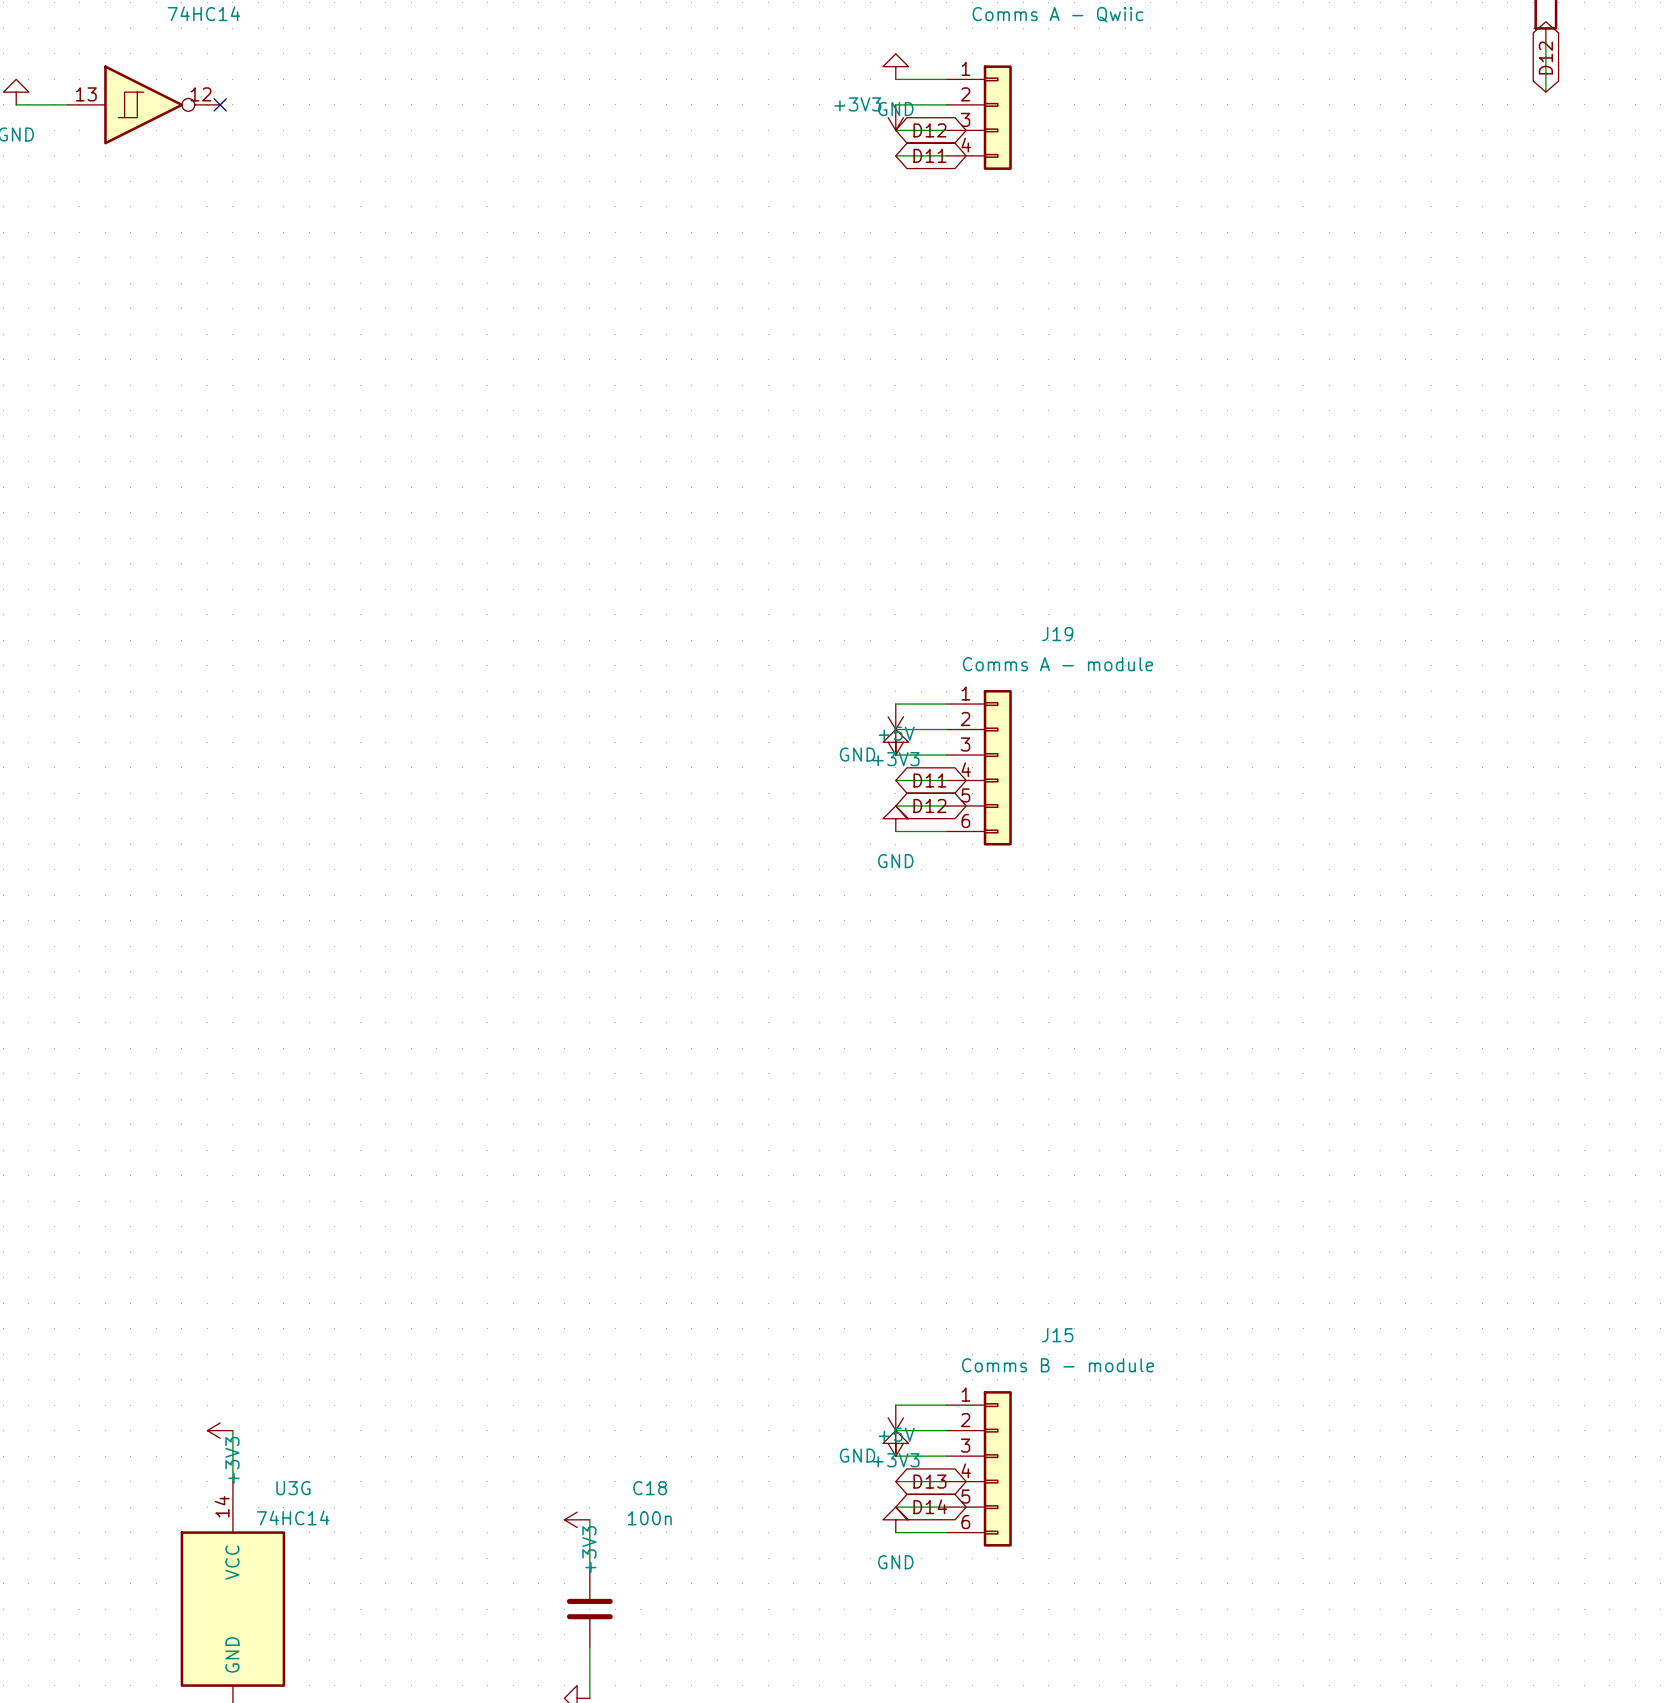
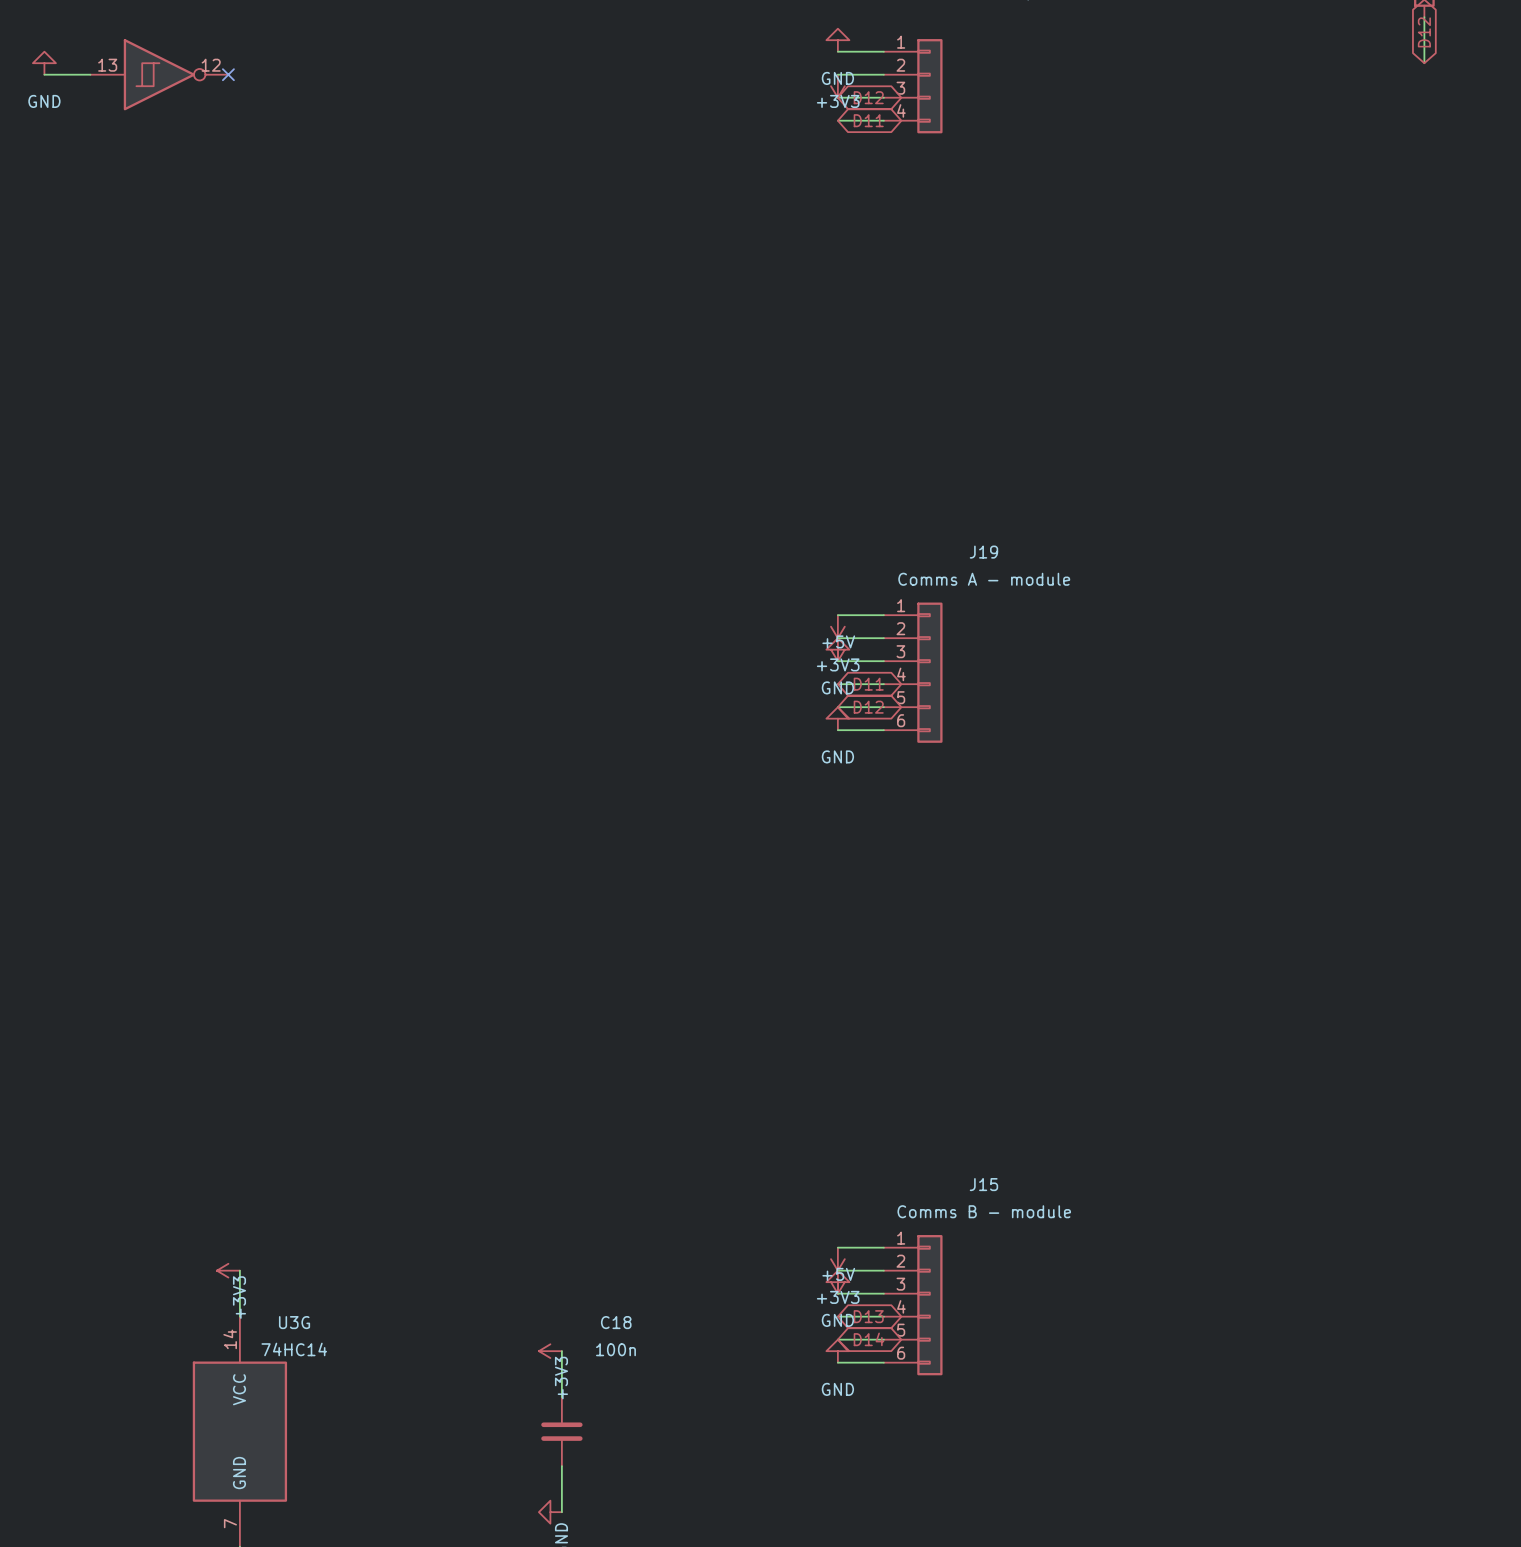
power symbol text position: +3V3 (857, 104) -> +3V3 (838, 101)
power symbol text position: GND (857, 754) -> GND (837, 687)
power symbol text position: GND (857, 1455) -> GND (837, 1320)

